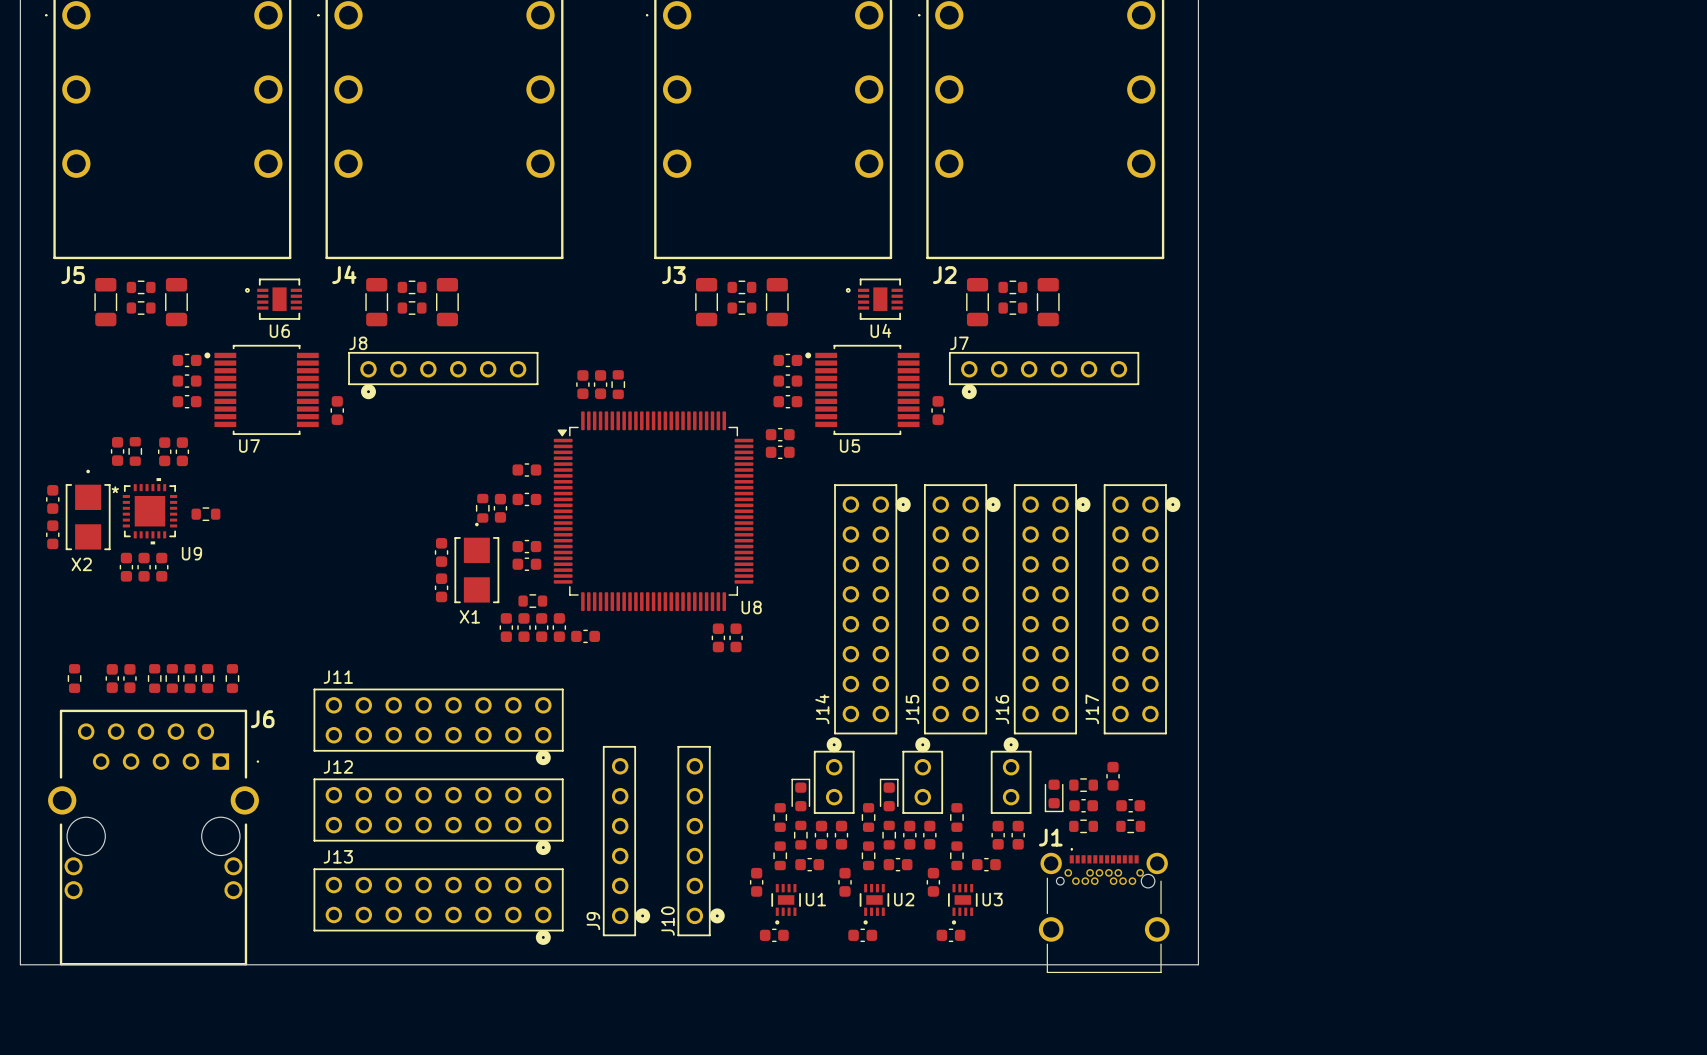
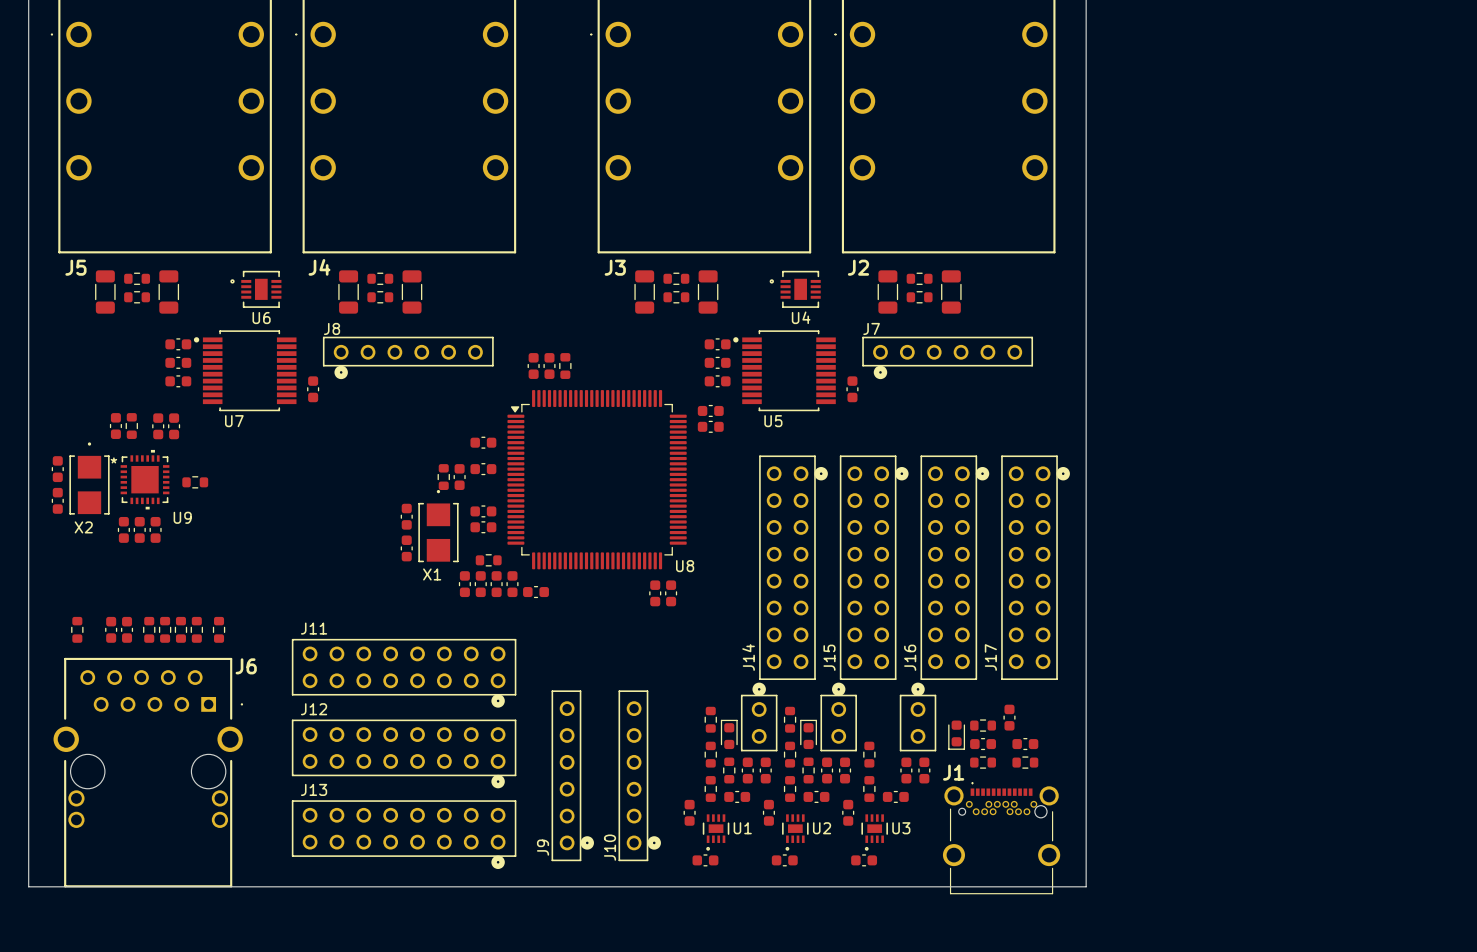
part: none -> (710, 719)
part: none -> (790, 719)

